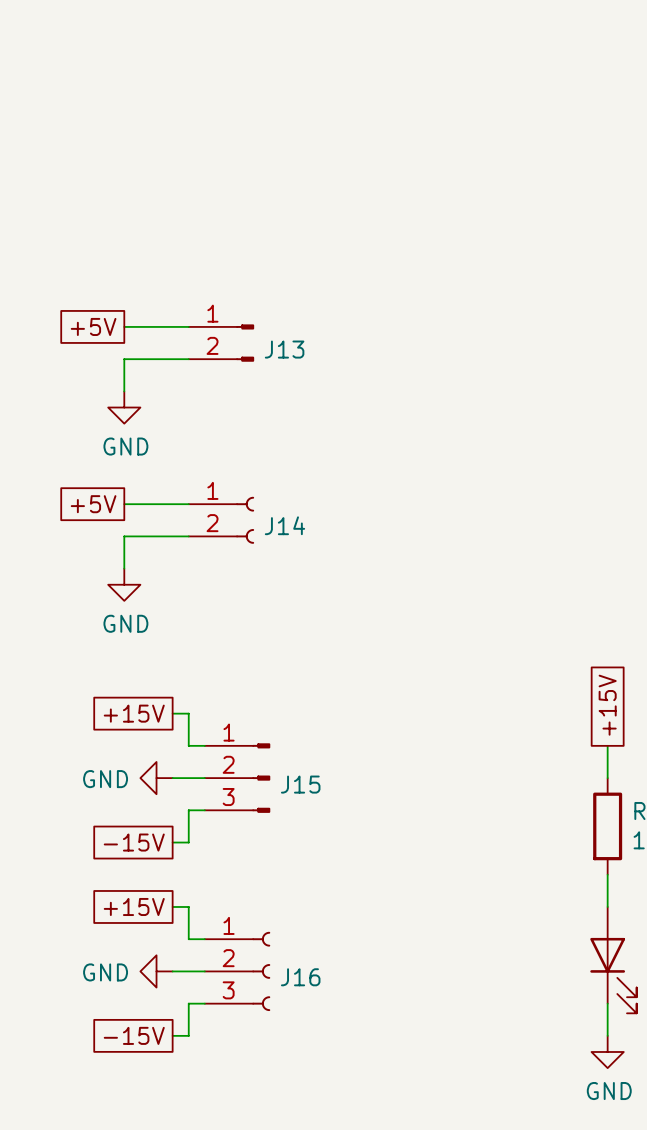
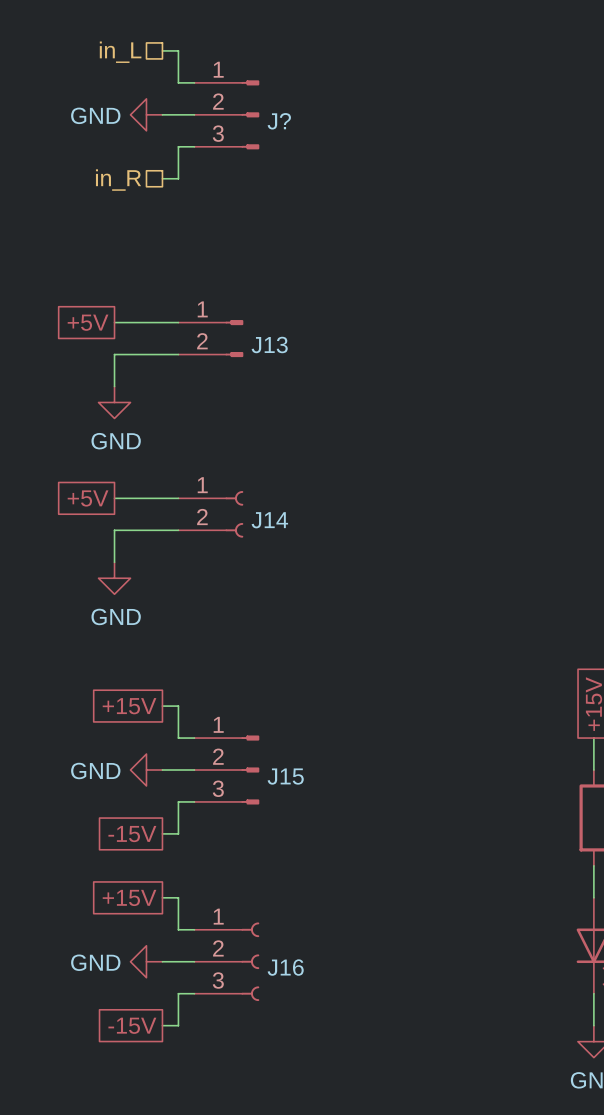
hierarchical label: none -> in_L (120, 52)
wire: none -> (162, 50) (178, 50) (178, 82) (194, 82)
power symbol: none -> GND (146, 114)
wire: none -> (162, 114) (194, 114)
J?: none -> (226, 114)
wire: none -> (194, 146) (178, 146) (178, 178) (162, 178)
hierarchical label: none -> in_R (118, 180)

